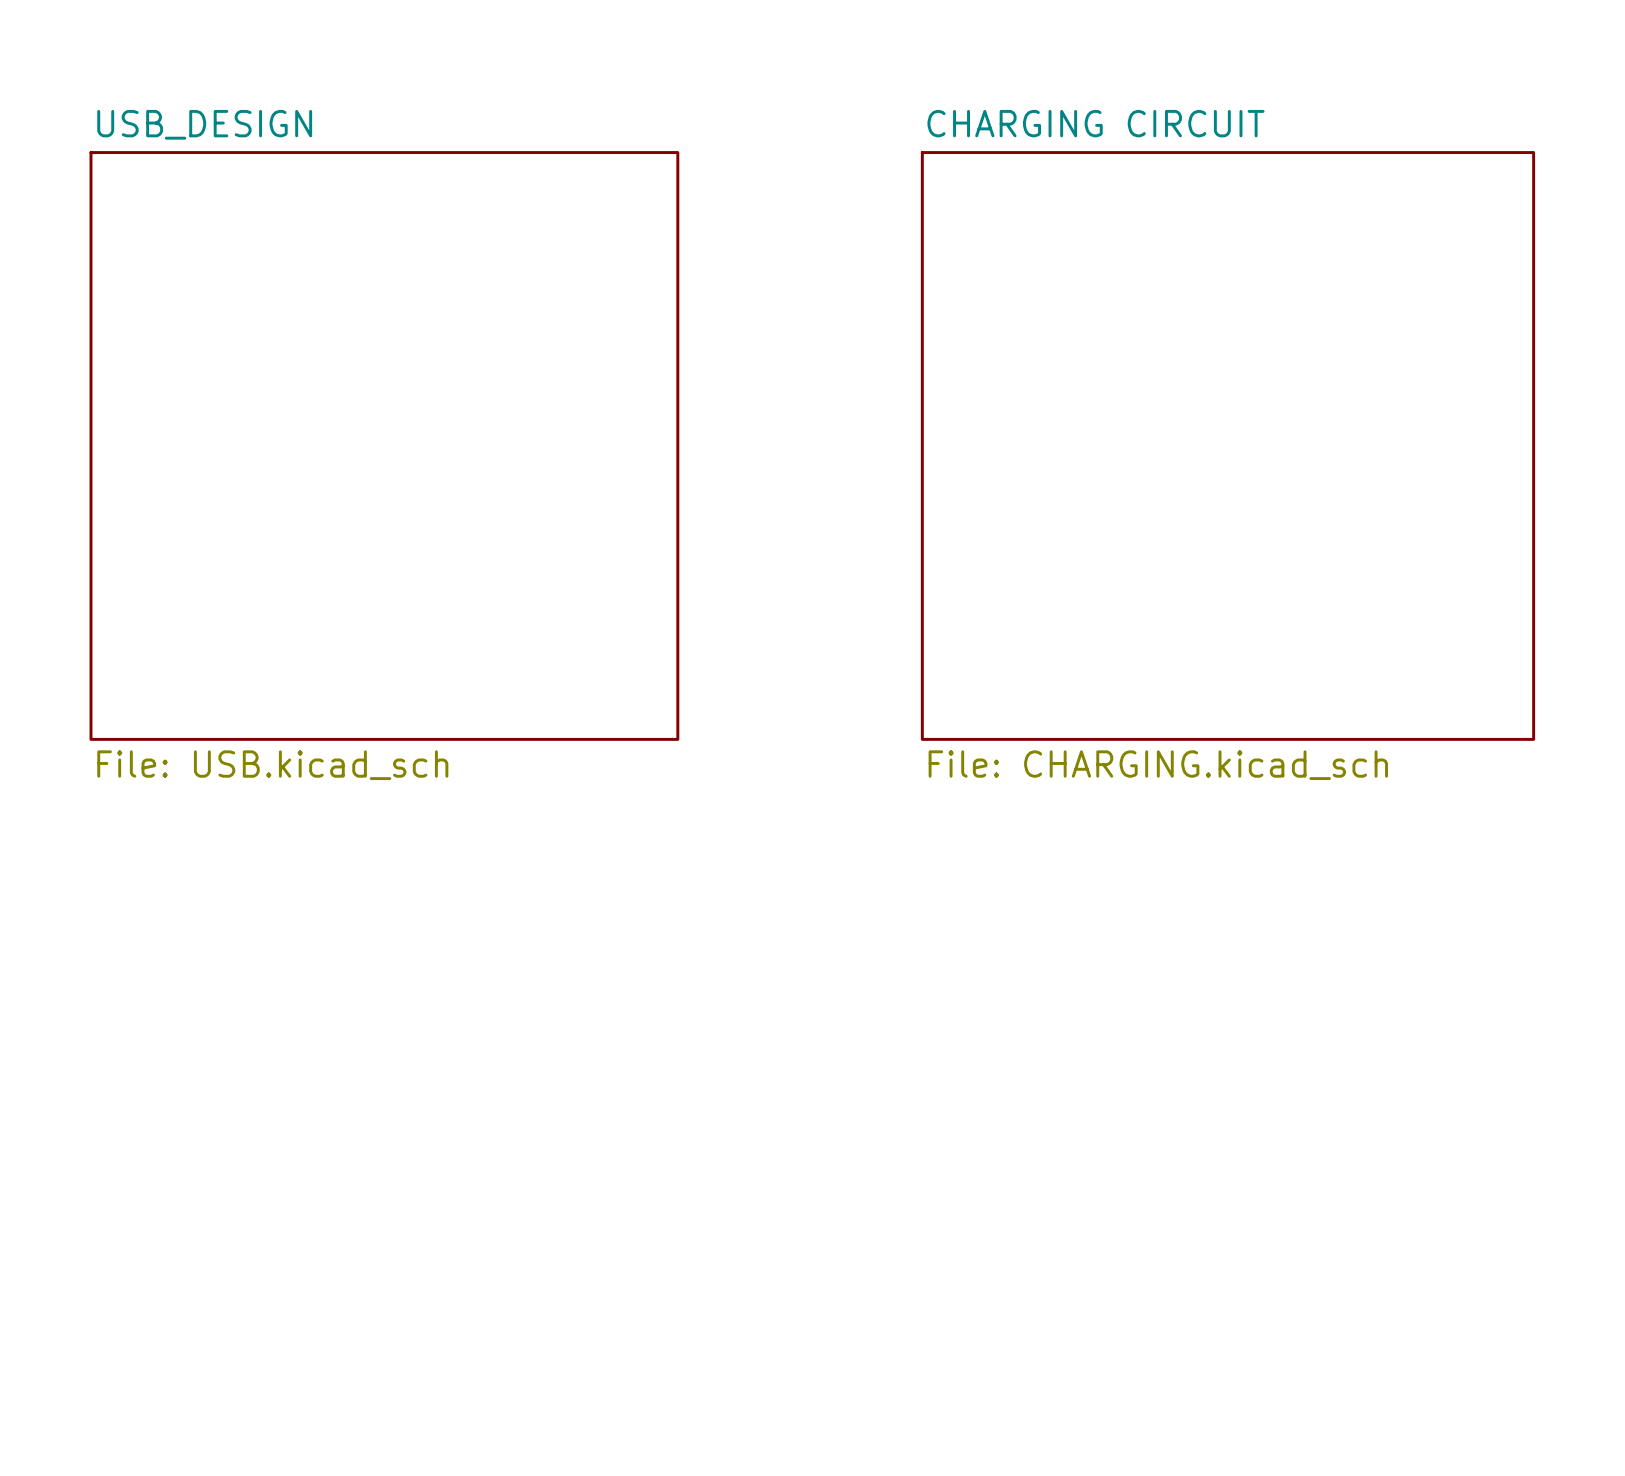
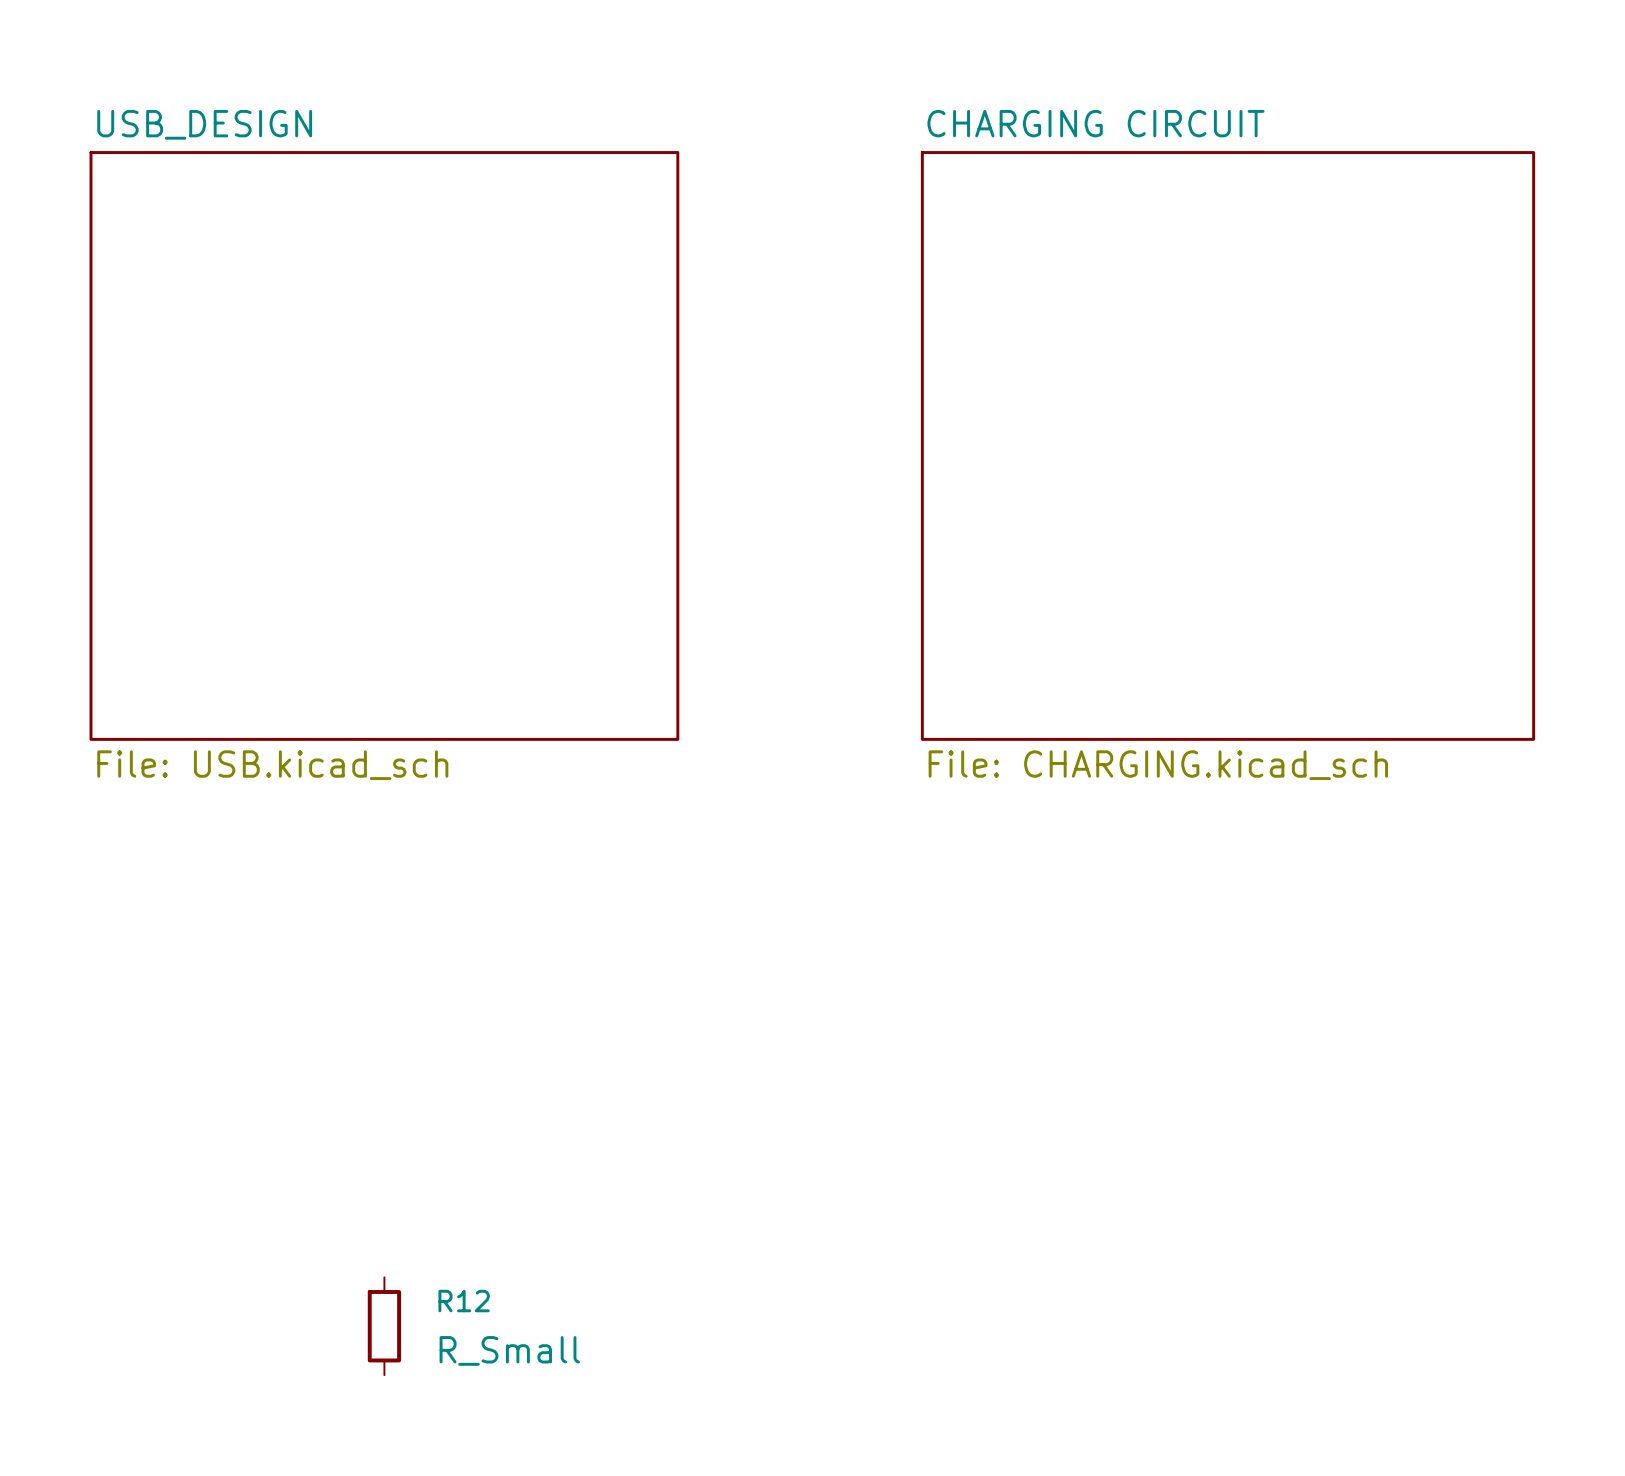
R12: none -> R_Small (384, 1326)

